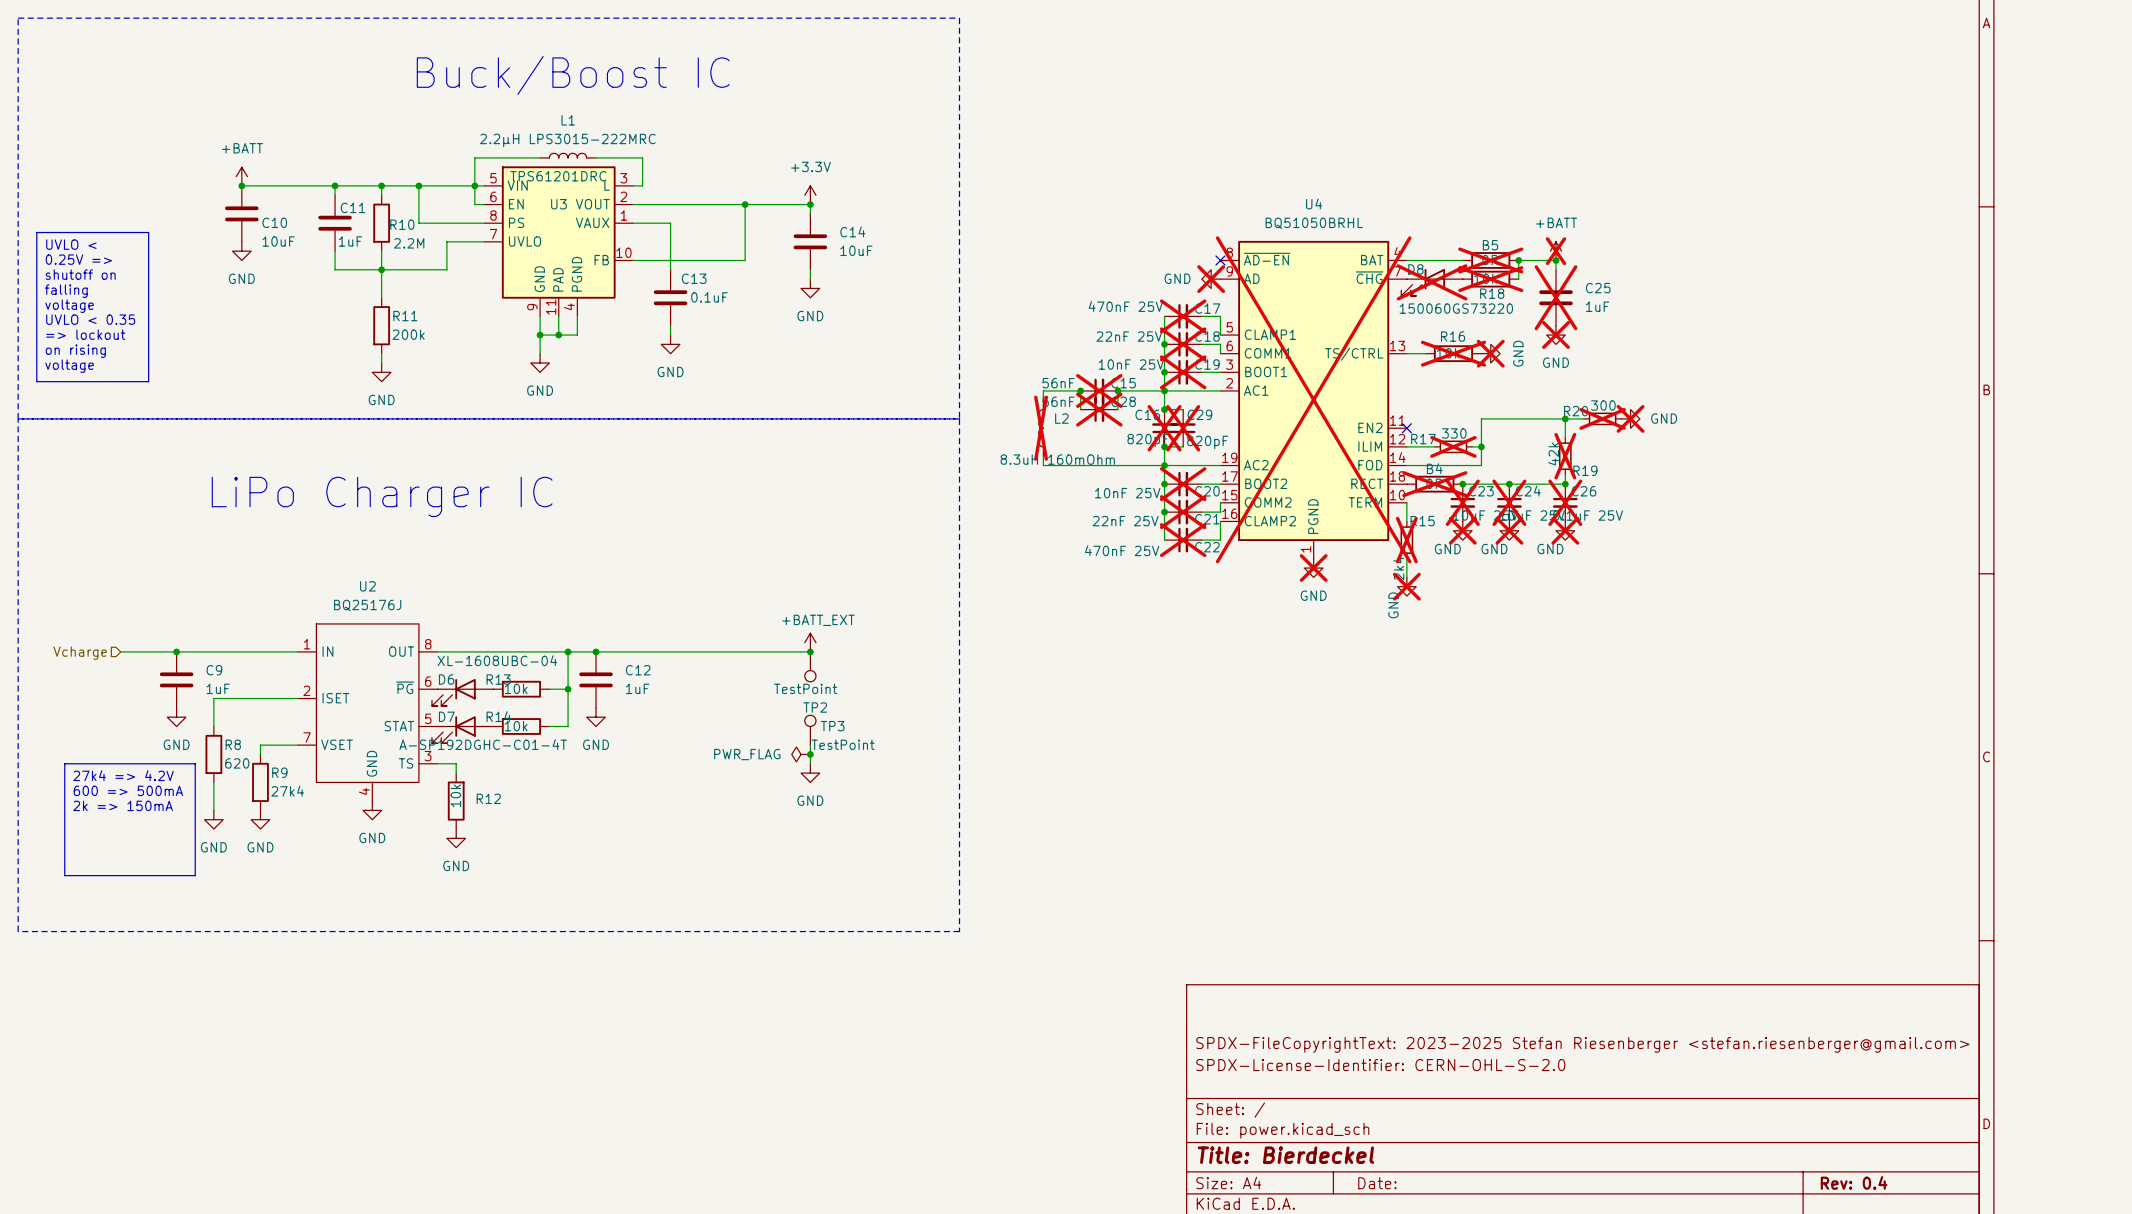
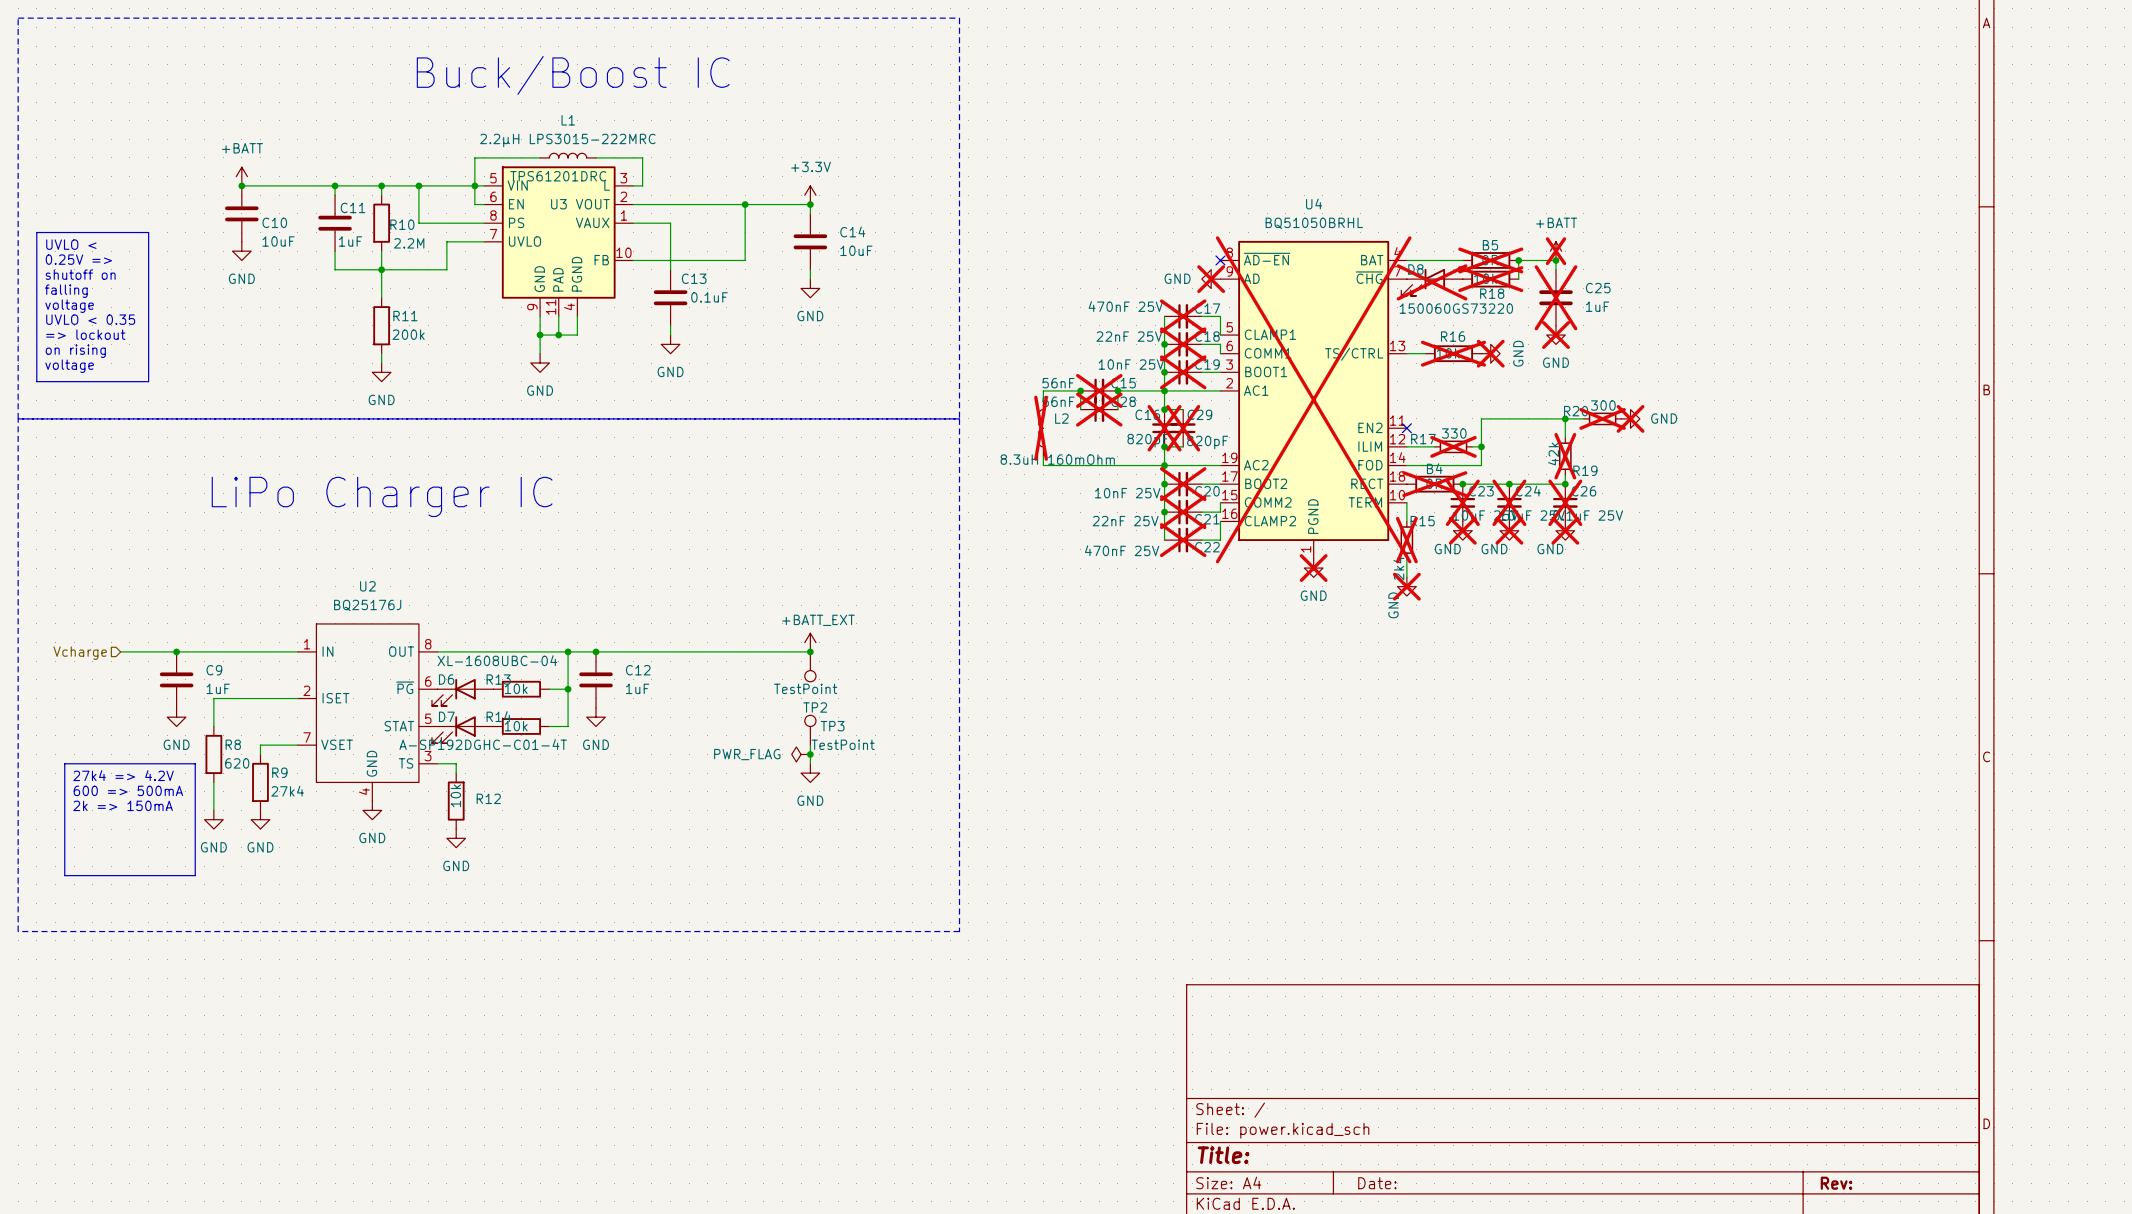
title block: SPDX-FileCopyrightText: 2023-2025 Stefan Riesenberger <stefan.riesenberger@gmail.com> (1582, 1044) -> none
title block: SPDX-License-Identifier: CERN-OHL-S-2.0 (1380, 1065) -> none
title block: Title: Bierdeckel (1285, 1155) -> Title: (1223, 1155)
title block: Rev: 0.4 (1854, 1182) -> Rev: (1836, 1183)

